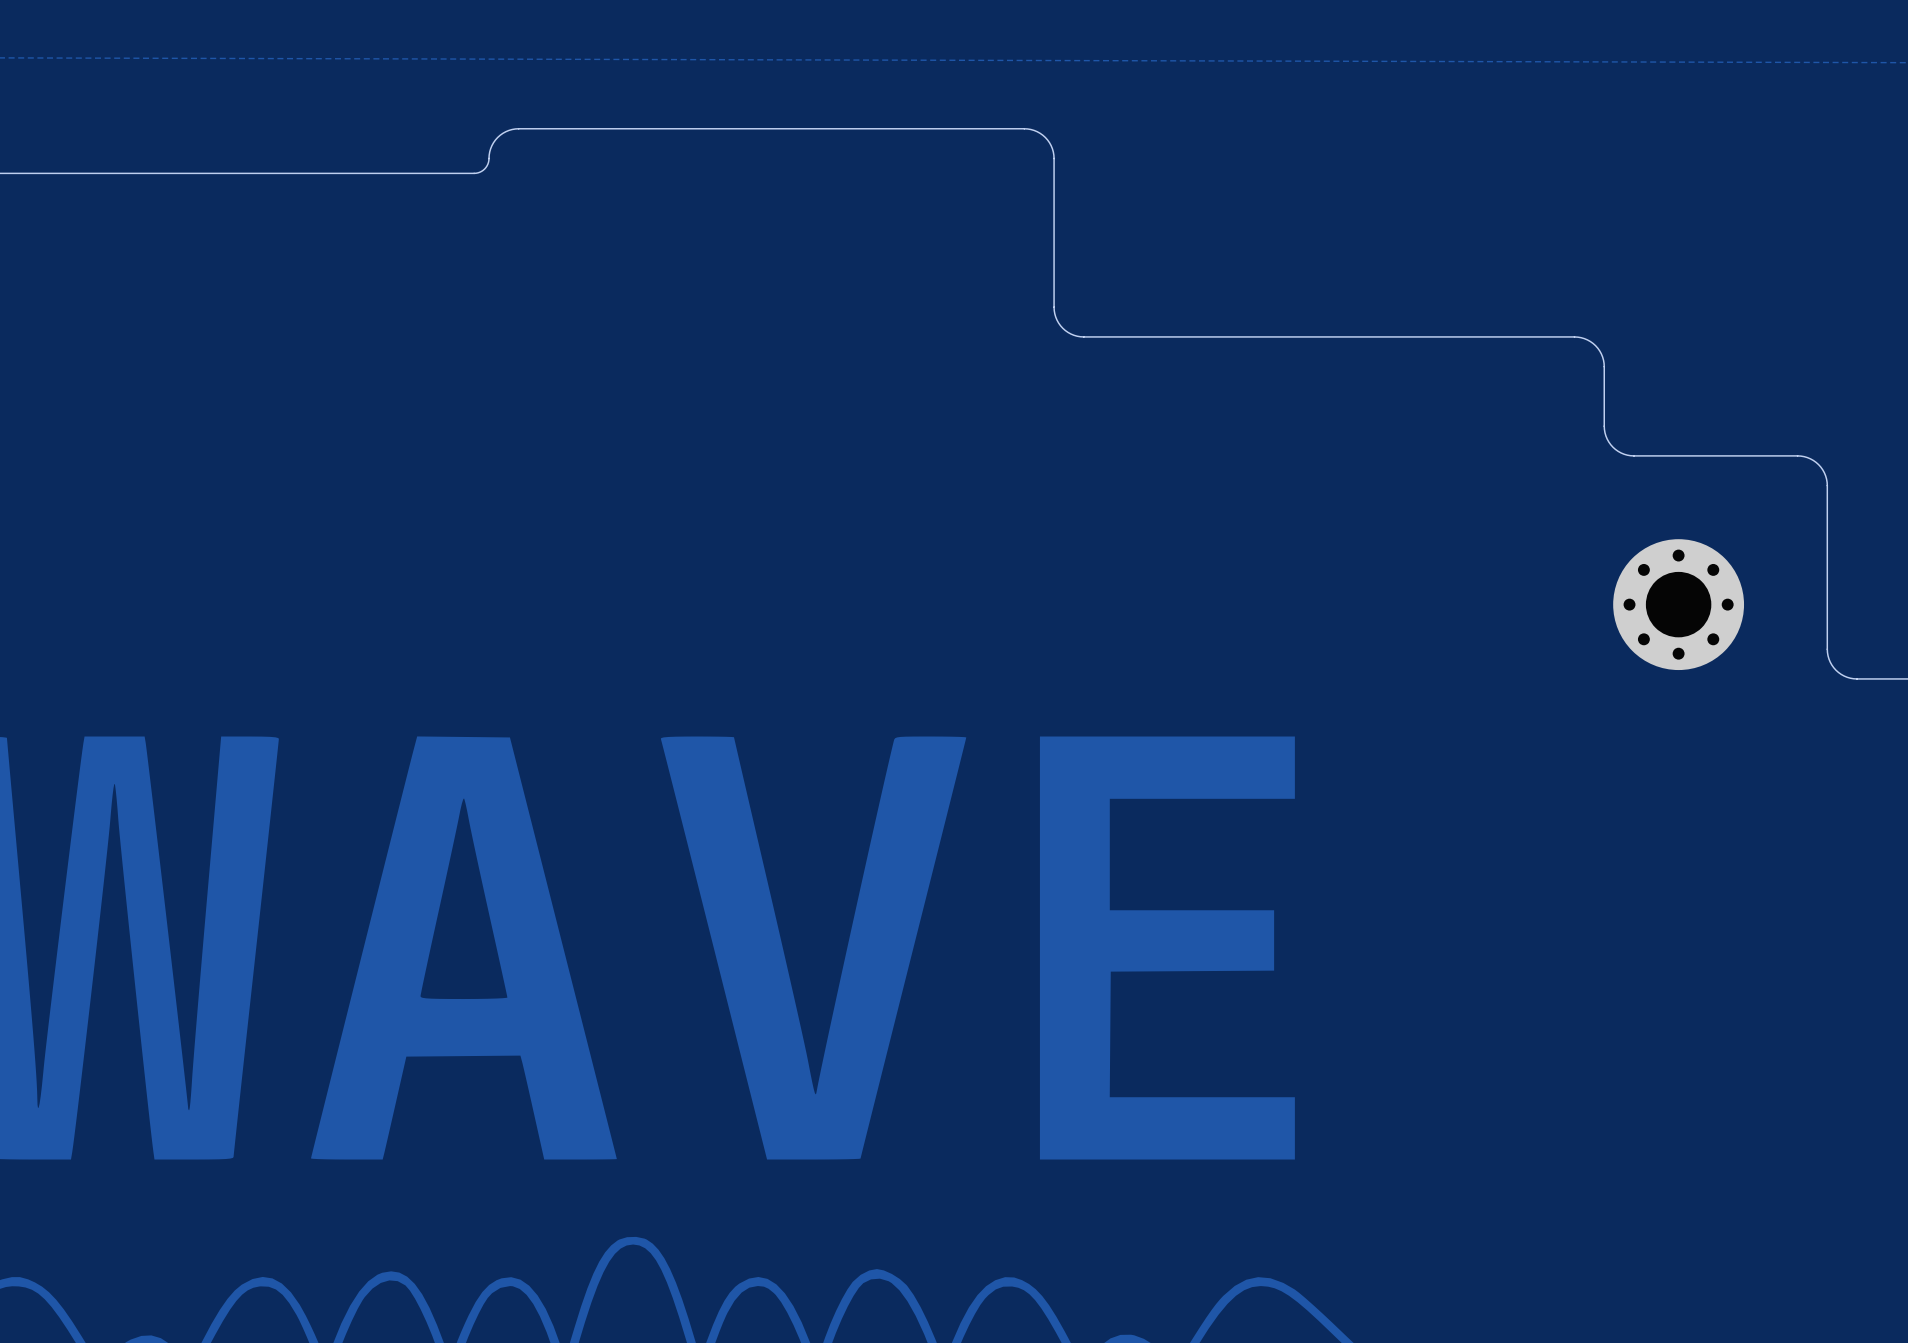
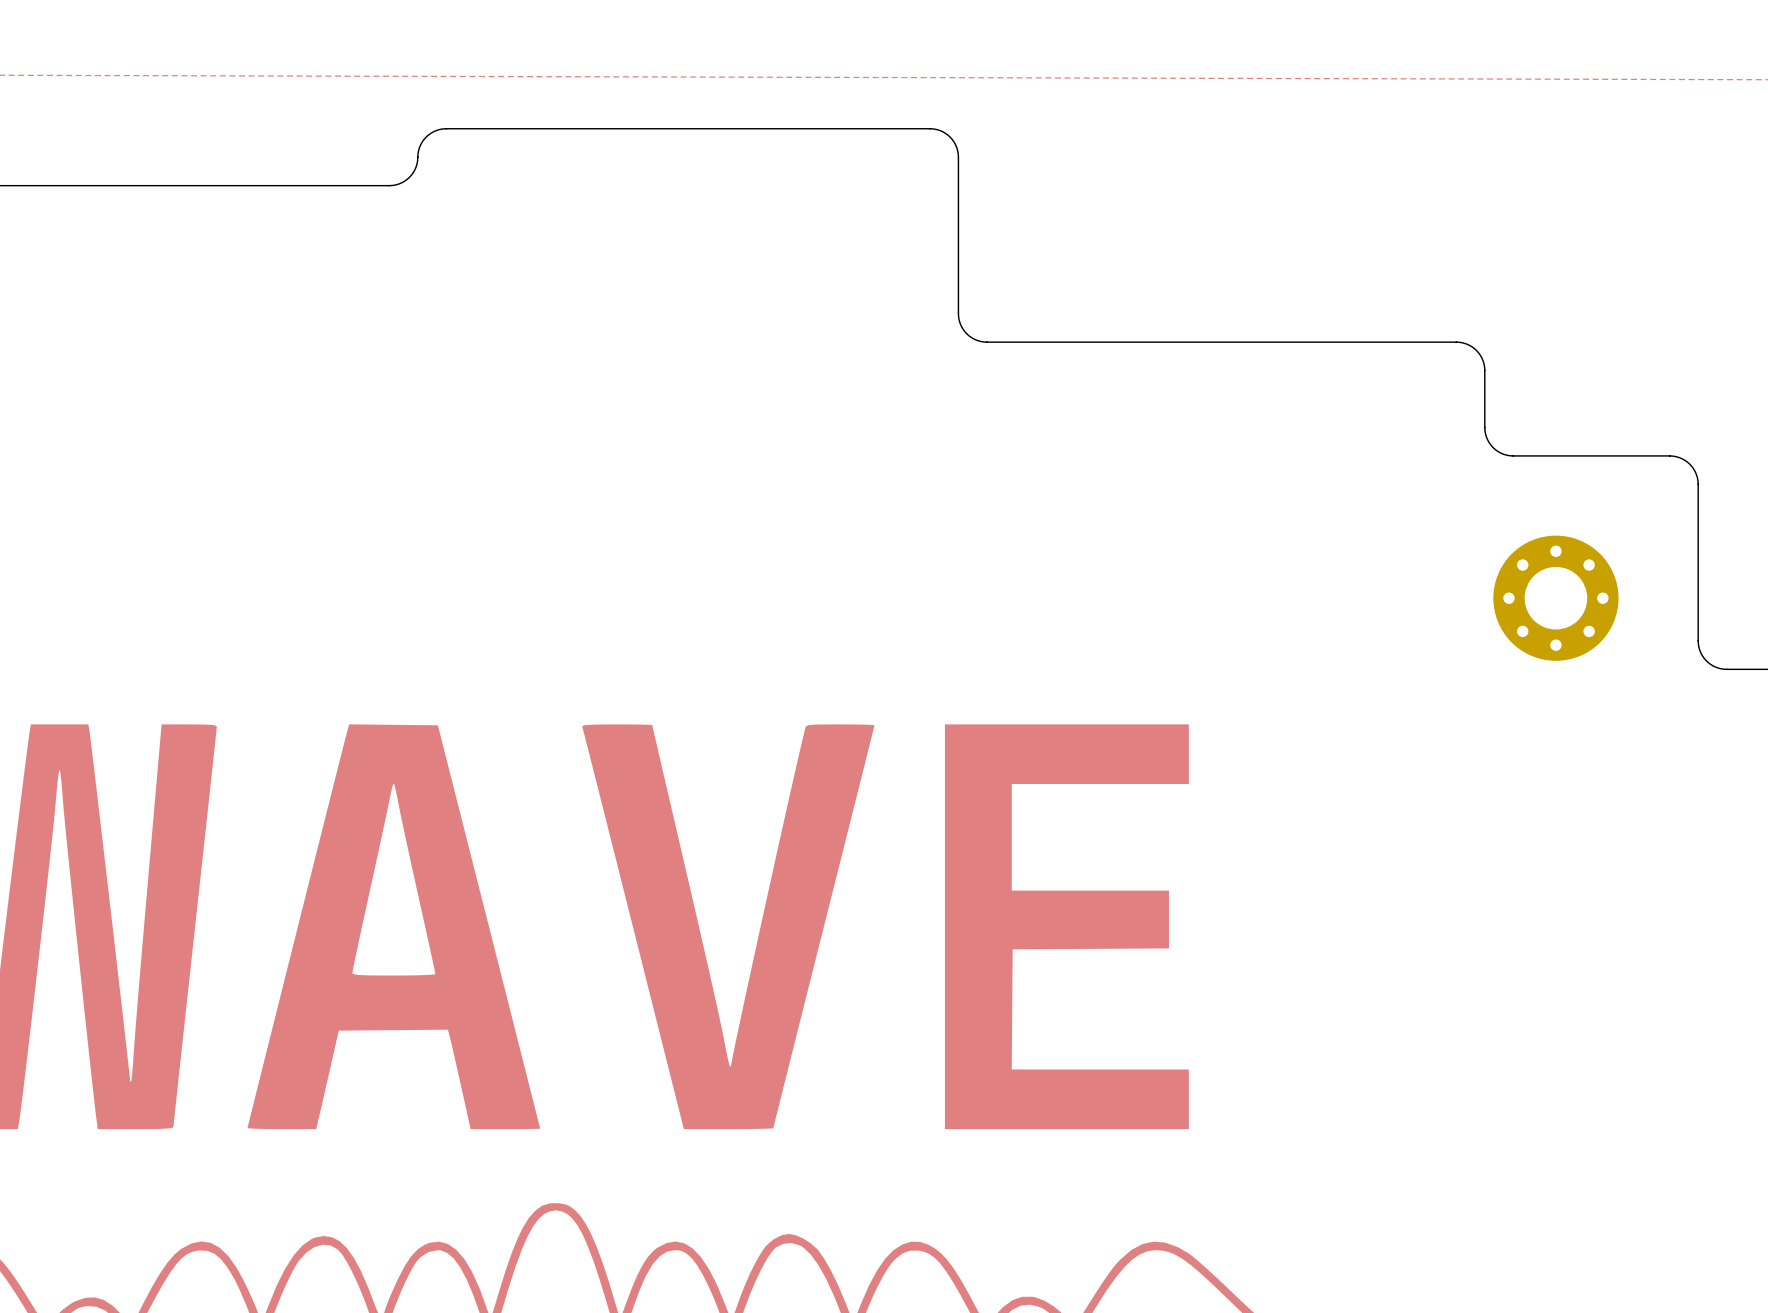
board edge: (1054, 158) (1051, 145) (1045, 137) (1034, 130) (1024, 128) (518, 128) (505, 131) (495, 139) (490, 148) (487, 164) (483, 170) (476, 173) (459, 173) -> (958, 171) (958, 154) (954, 142) (945, 133) (933, 128) (446, 128) (436, 130) (426, 137) (419, 147) (417, 163) (411, 174) (401, 182) (389, 185)

